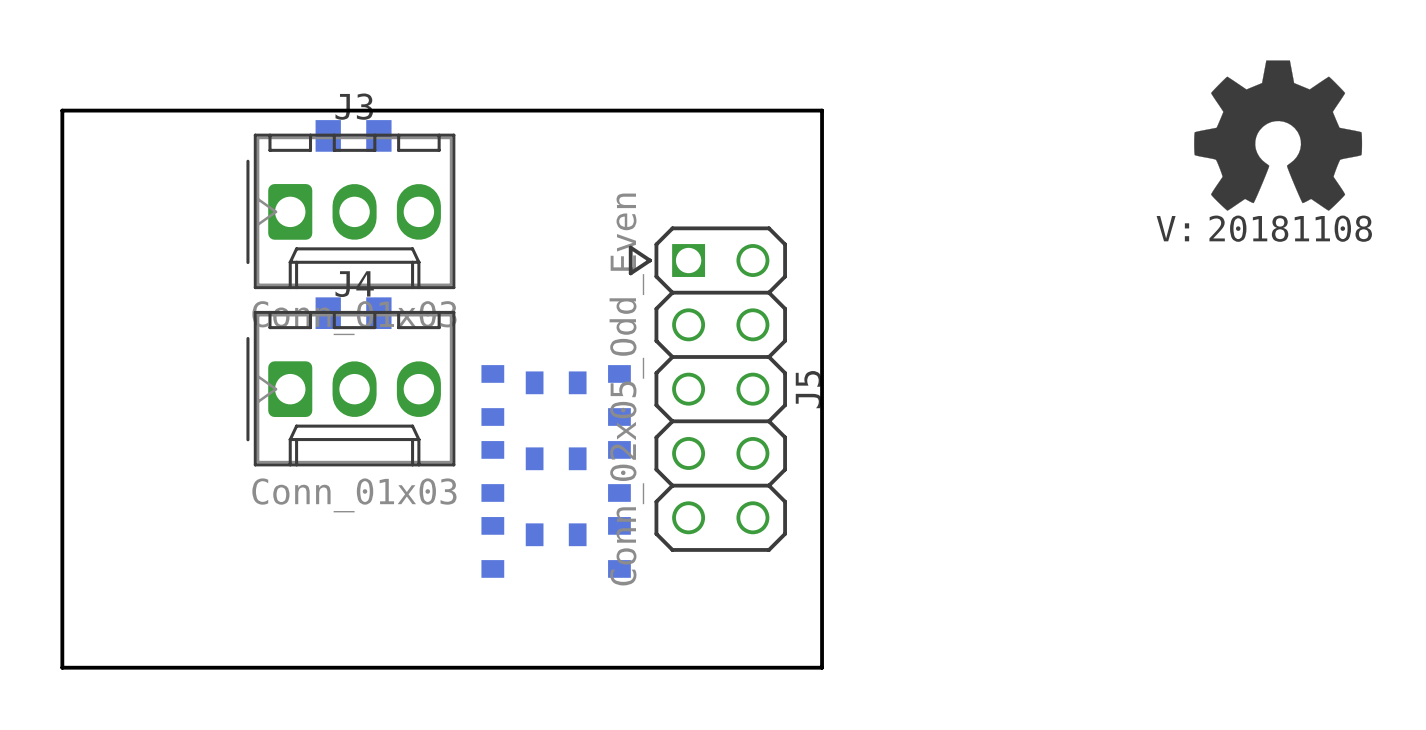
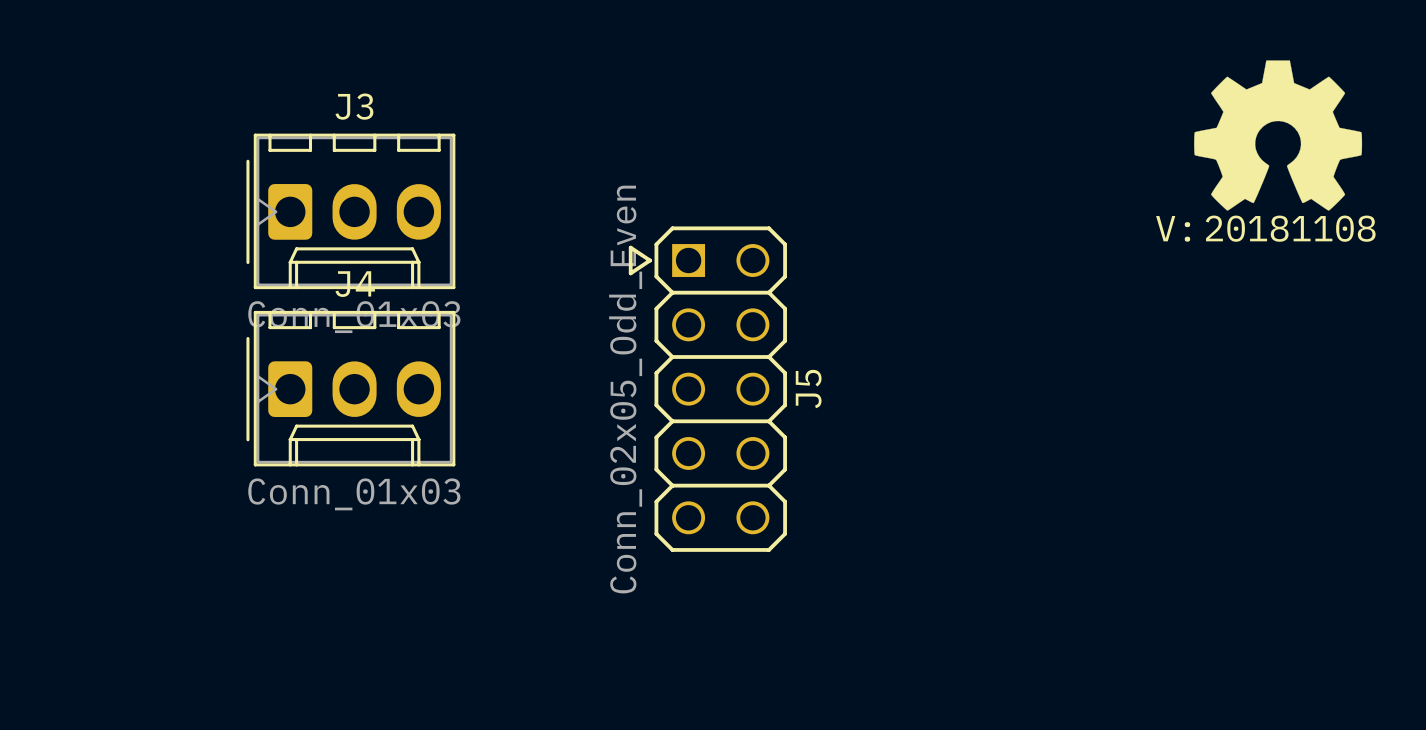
board edge: (62, 110) (822, 110) (822, 667) (62, 667) (62, 110) -> none
part: (353, 135) -> none
part: (353, 313) -> none
part: (556, 382) -> none
part: (492, 395) -> none
part: (619, 395) -> none
part: (556, 458) -> none
part: (492, 471) -> none
part: (619, 471) -> none
part: (556, 534) -> none
part: (492, 547) -> none
part: (619, 547) -> none

